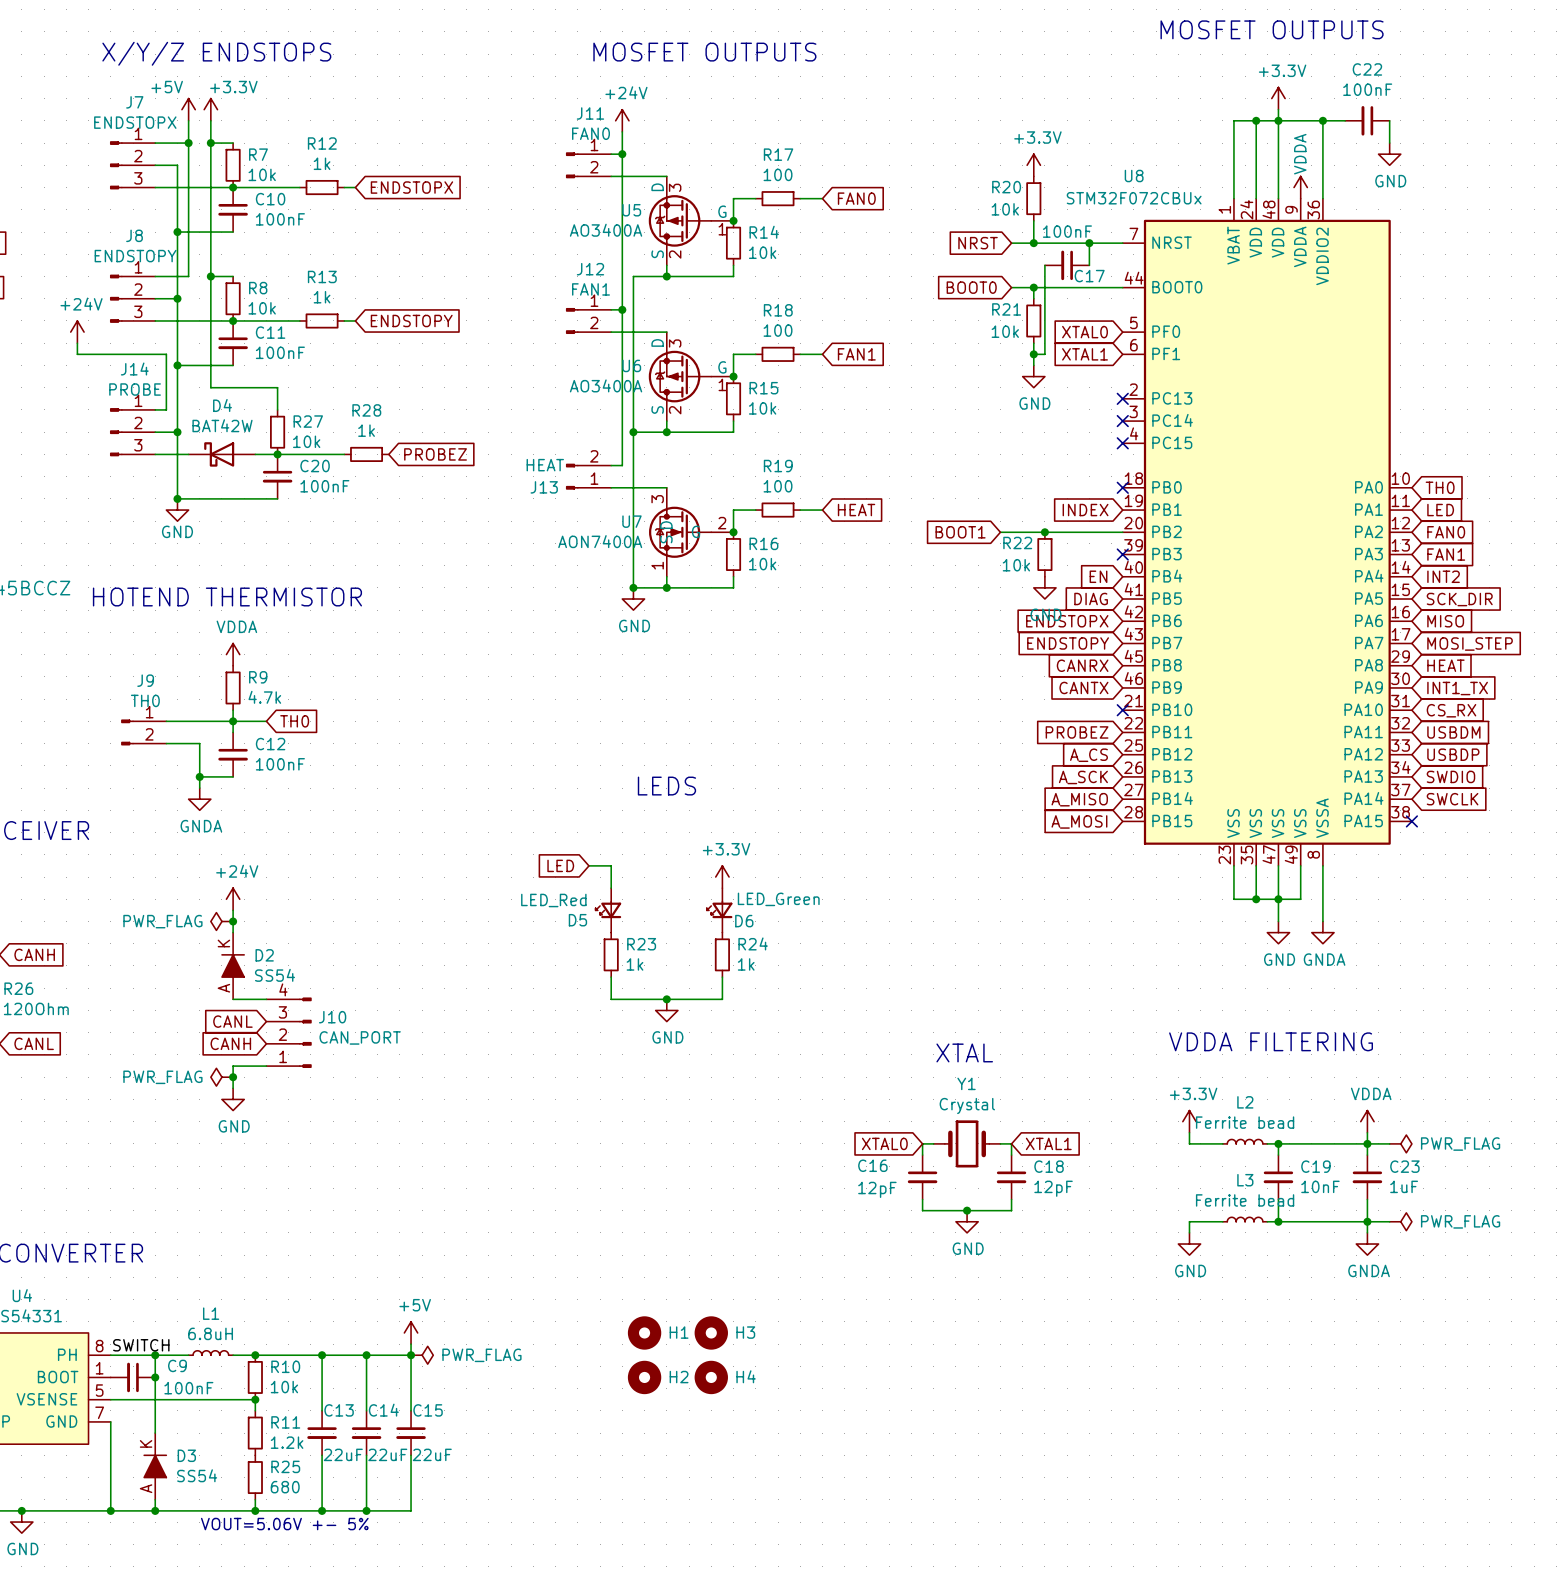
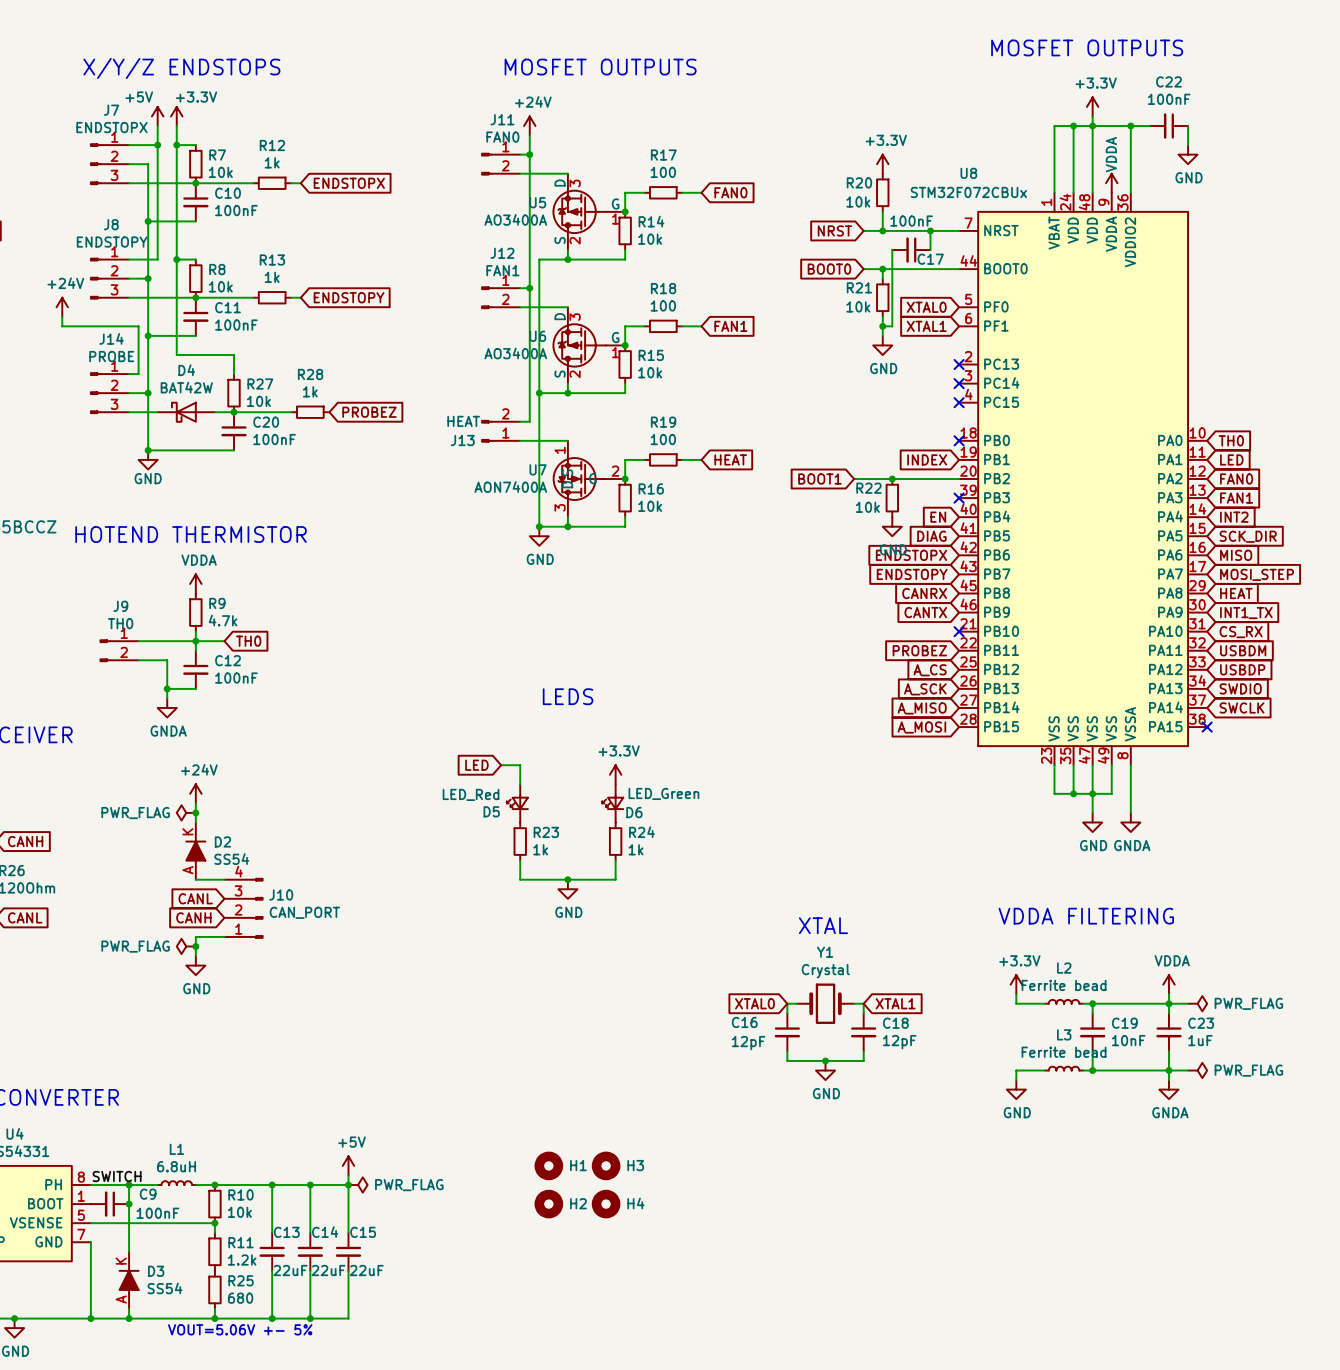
U7 flip: as is (680, 532) -> up-down (579, 479)

